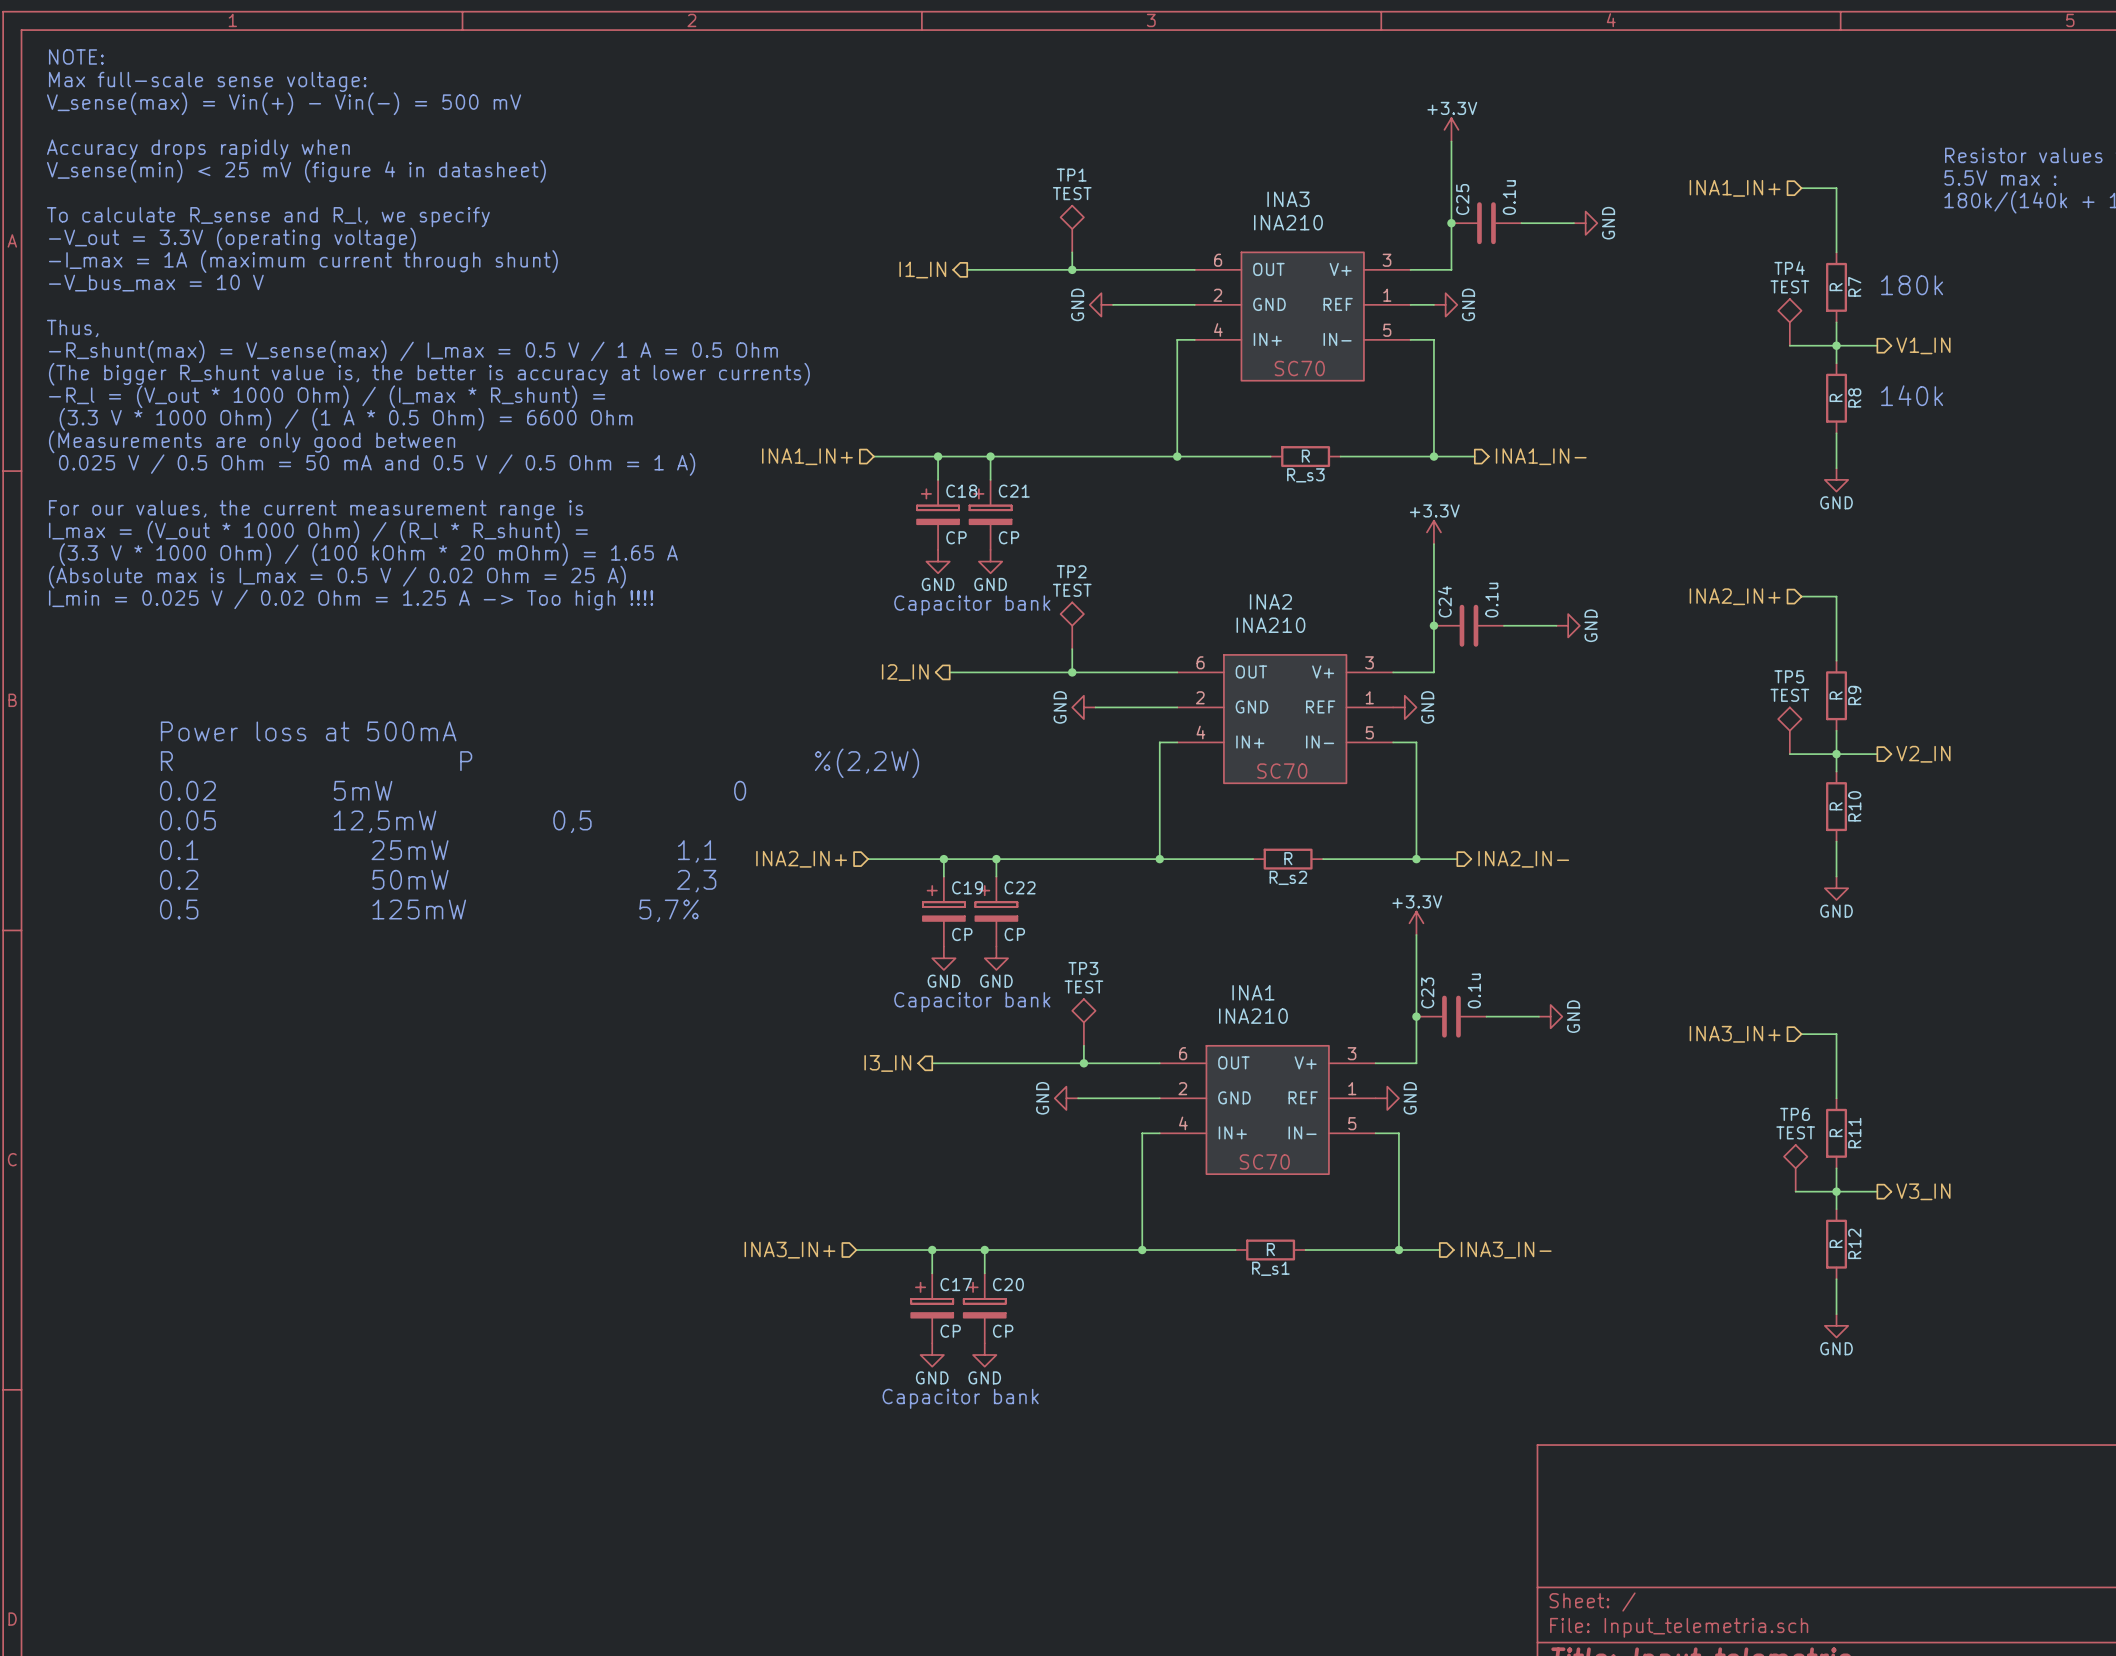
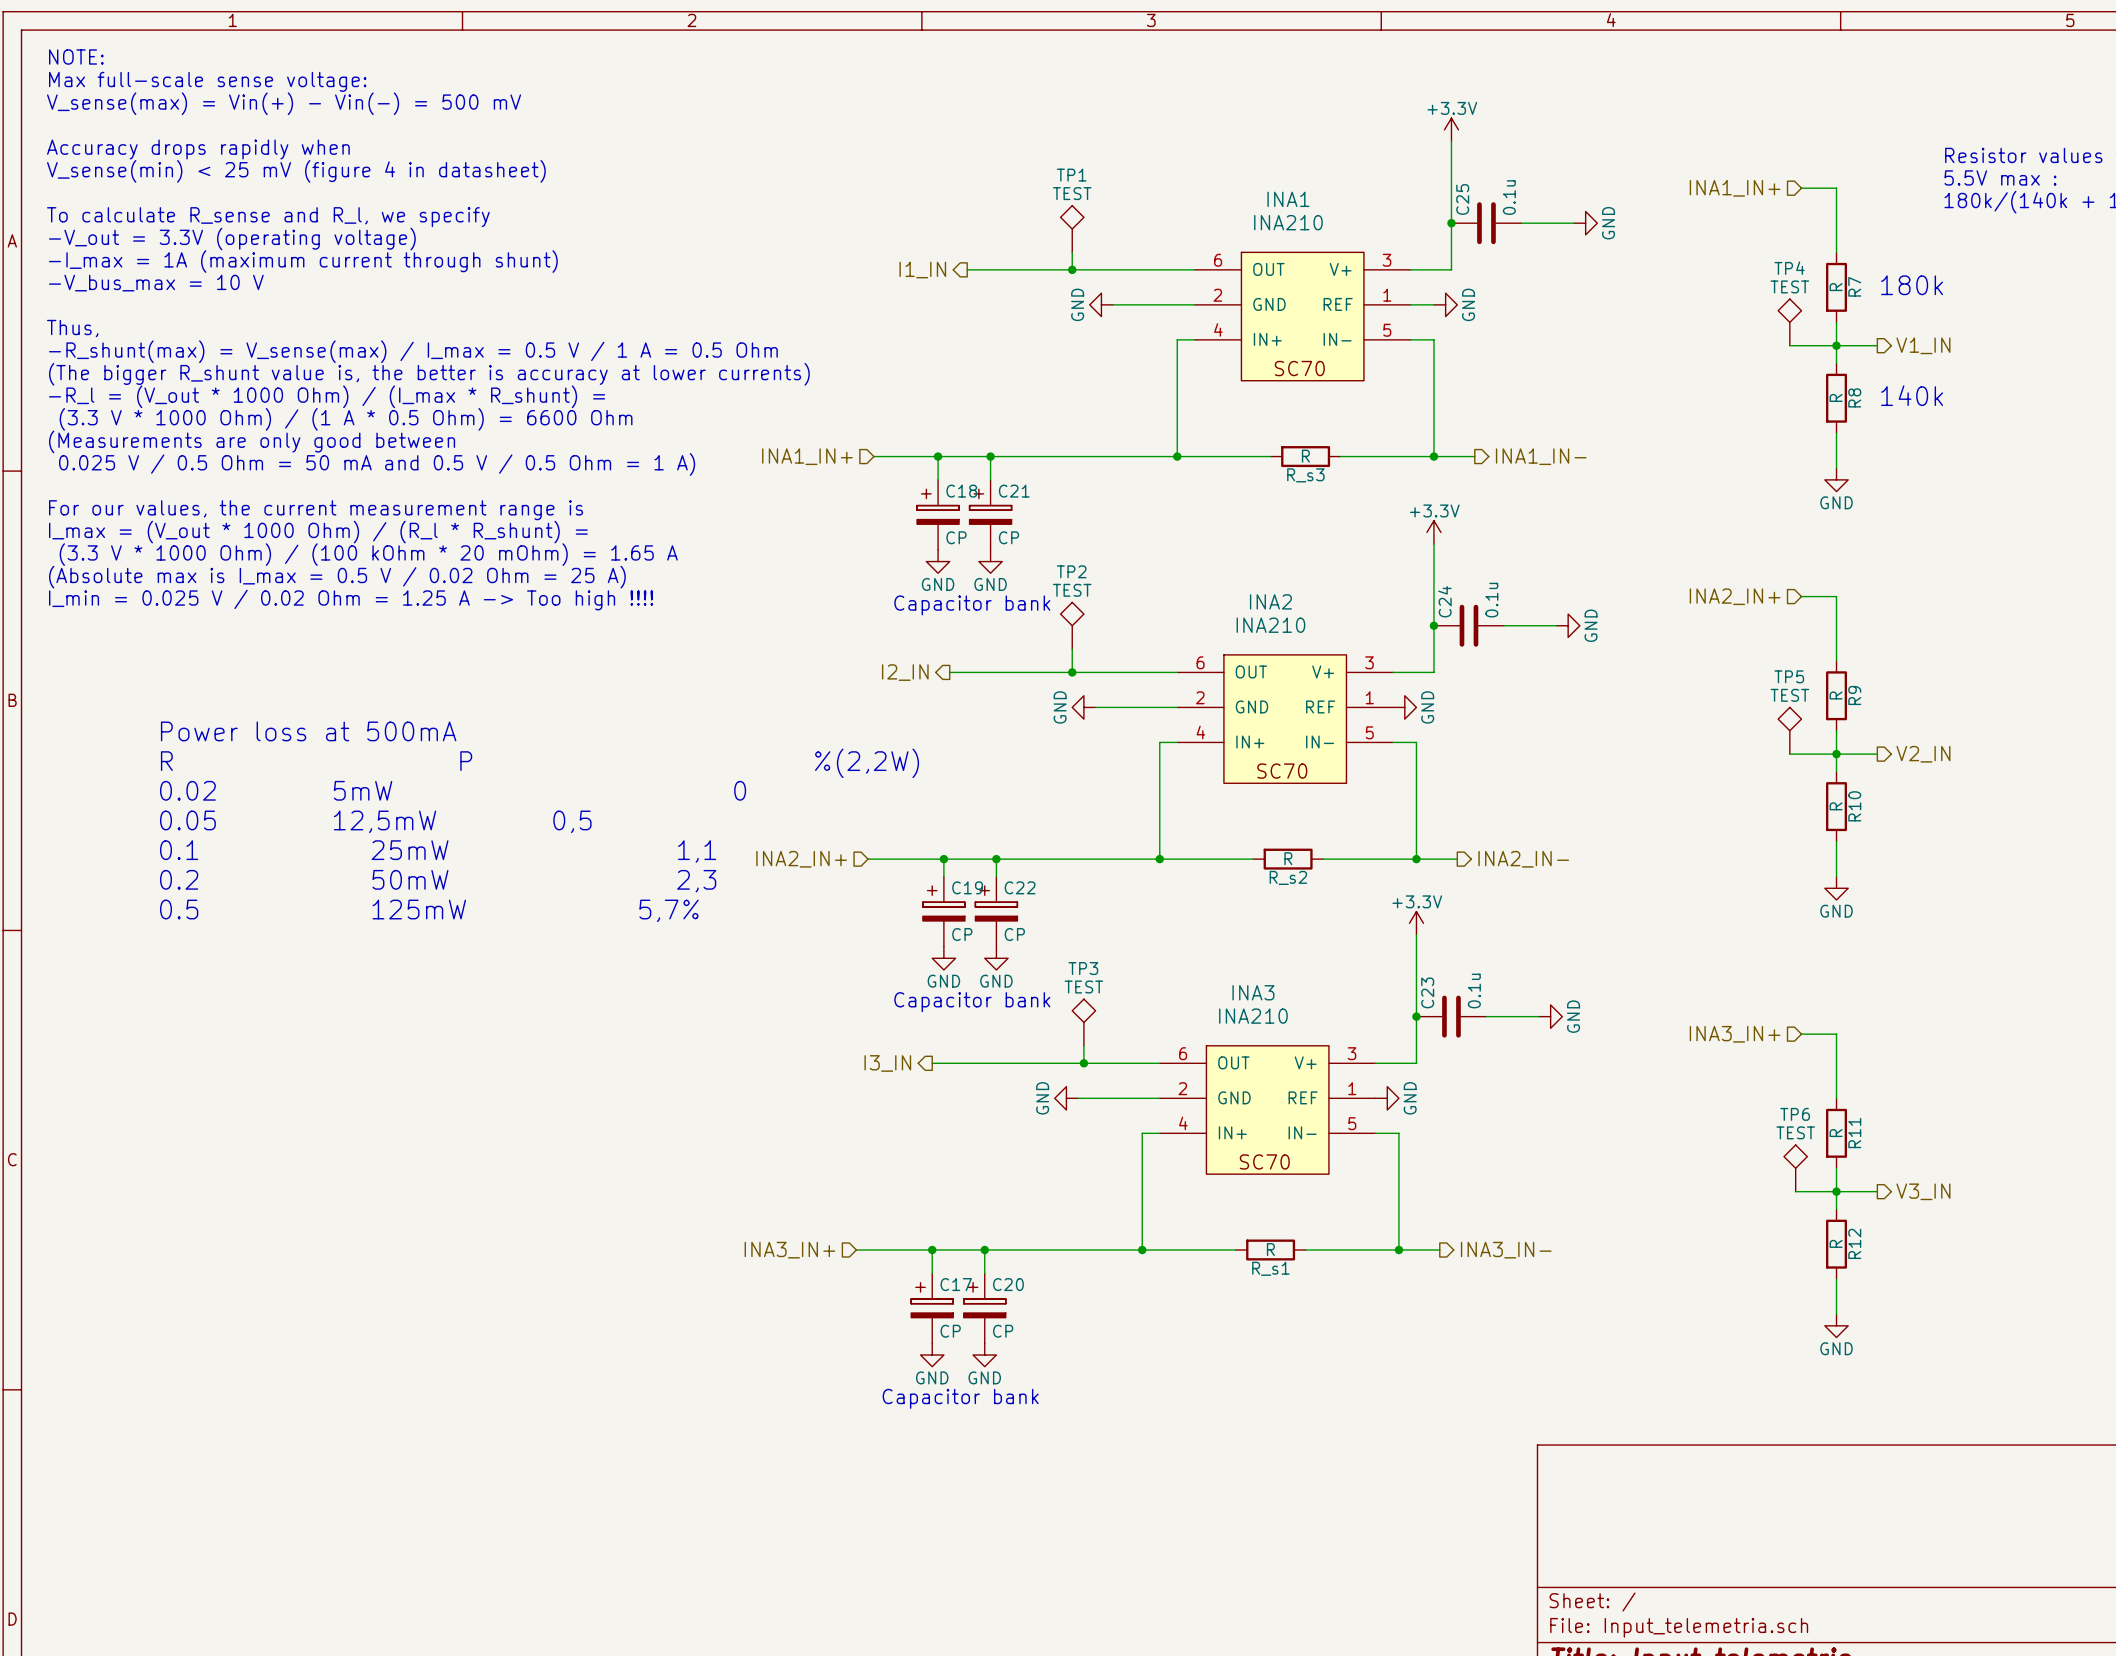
INA3 name: INA3 (1288, 199) -> INA1 (1288, 199)
INA1 name: INA1 (1253, 992) -> INA3 (1253, 992)

